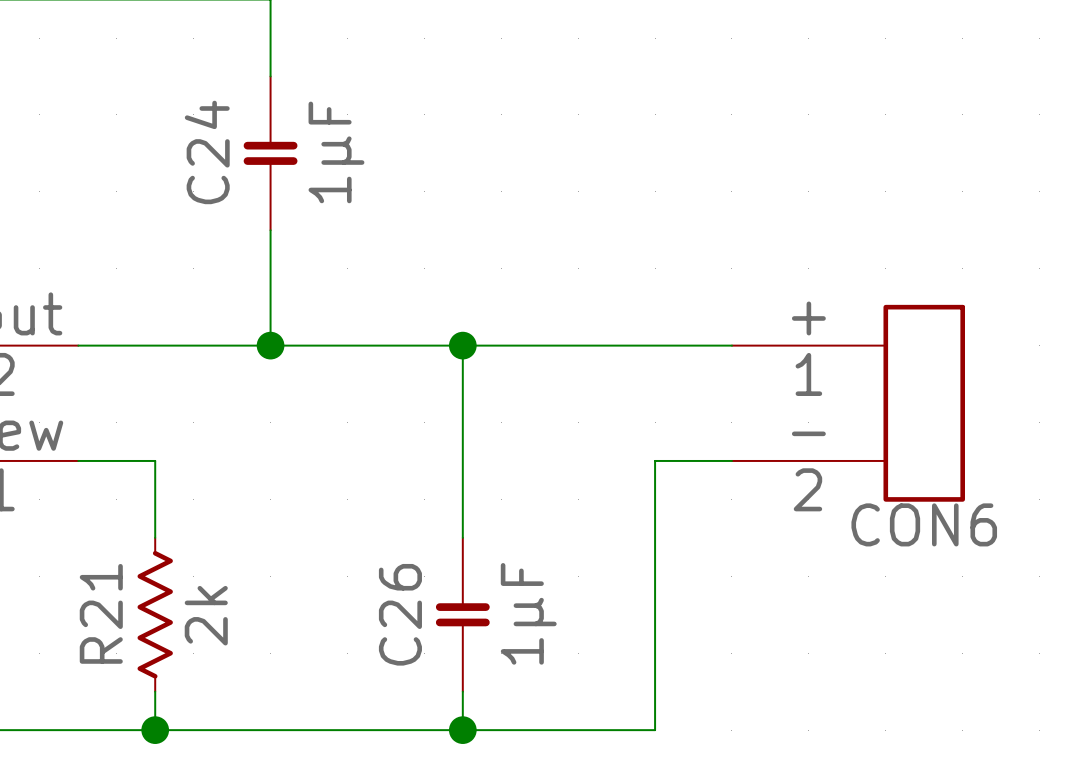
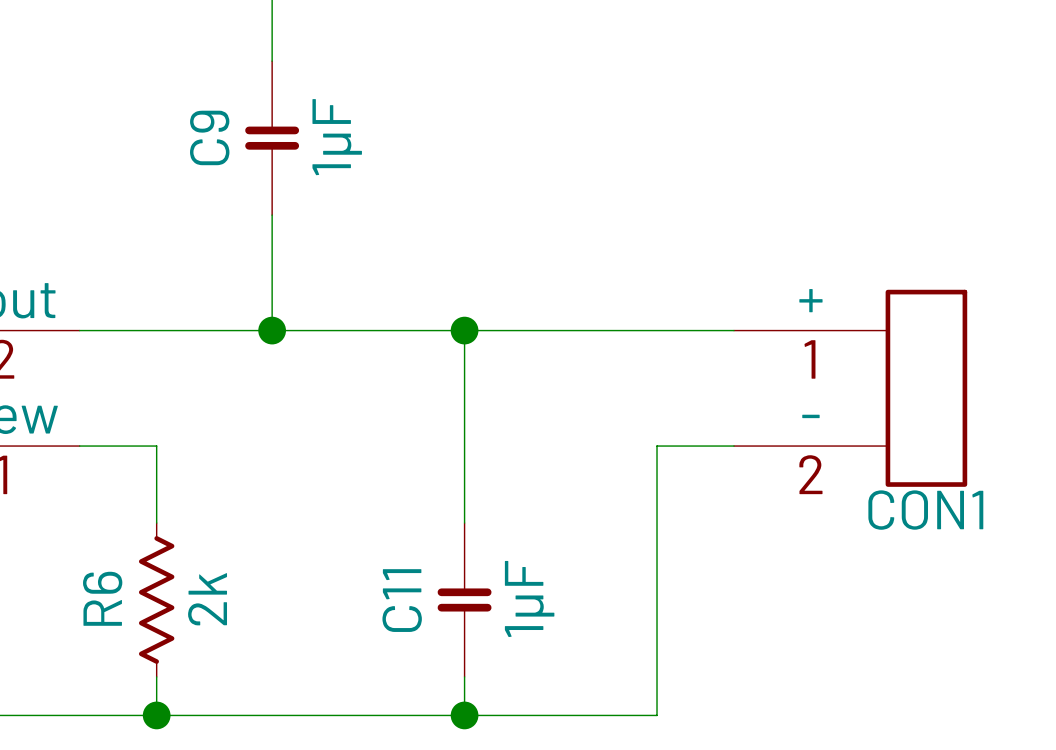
C24 name: C24 (207, 152) -> C9 (209, 137)
CON6 name: CON6 (924, 524) -> CON1 (925, 510)
R21 name: R21 (101, 613) -> R6 (102, 598)
C26 name: C26 (400, 614) -> C11 (402, 600)

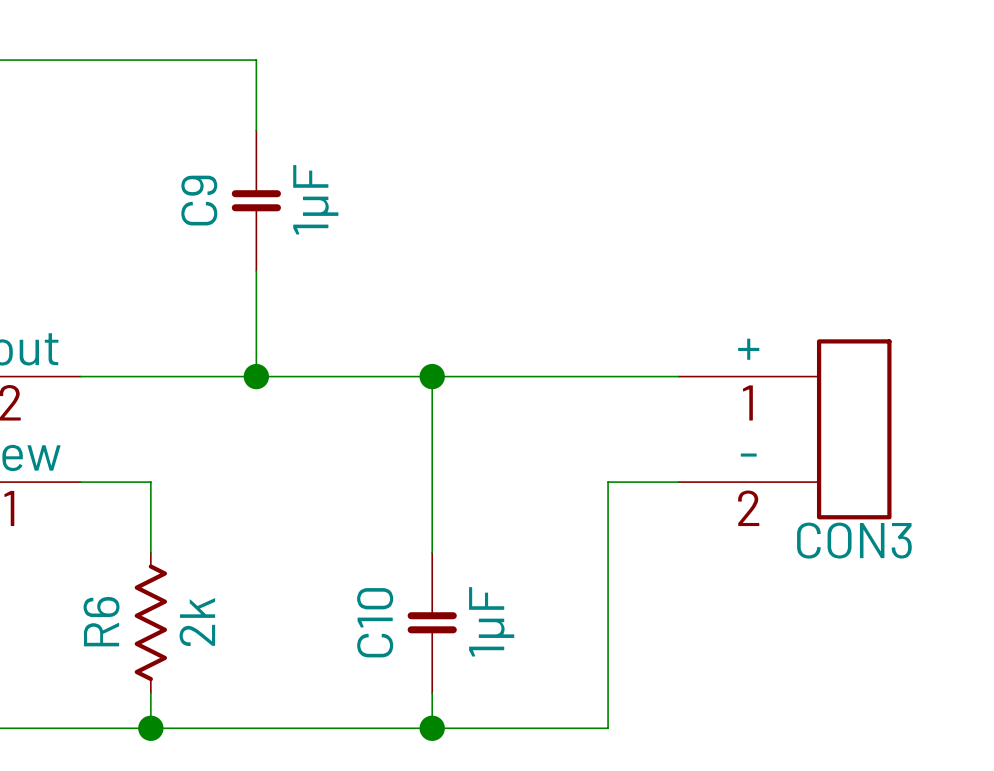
CON1 name: CON1 (925, 510) -> CON3 (854, 540)
C11 name: C11 (402, 600) -> C10 (375, 622)

